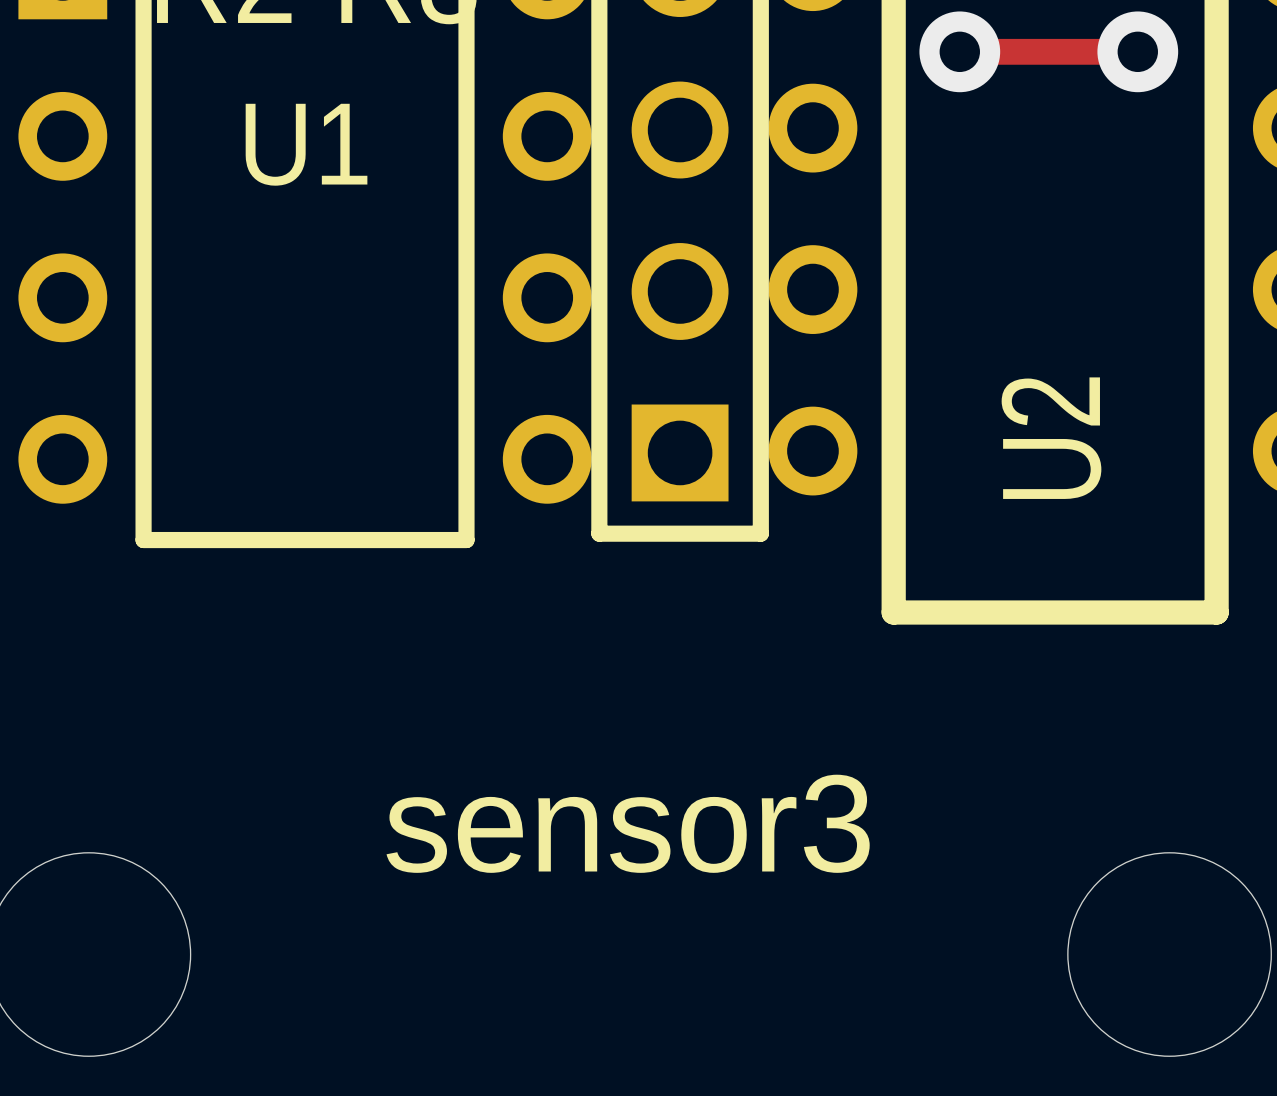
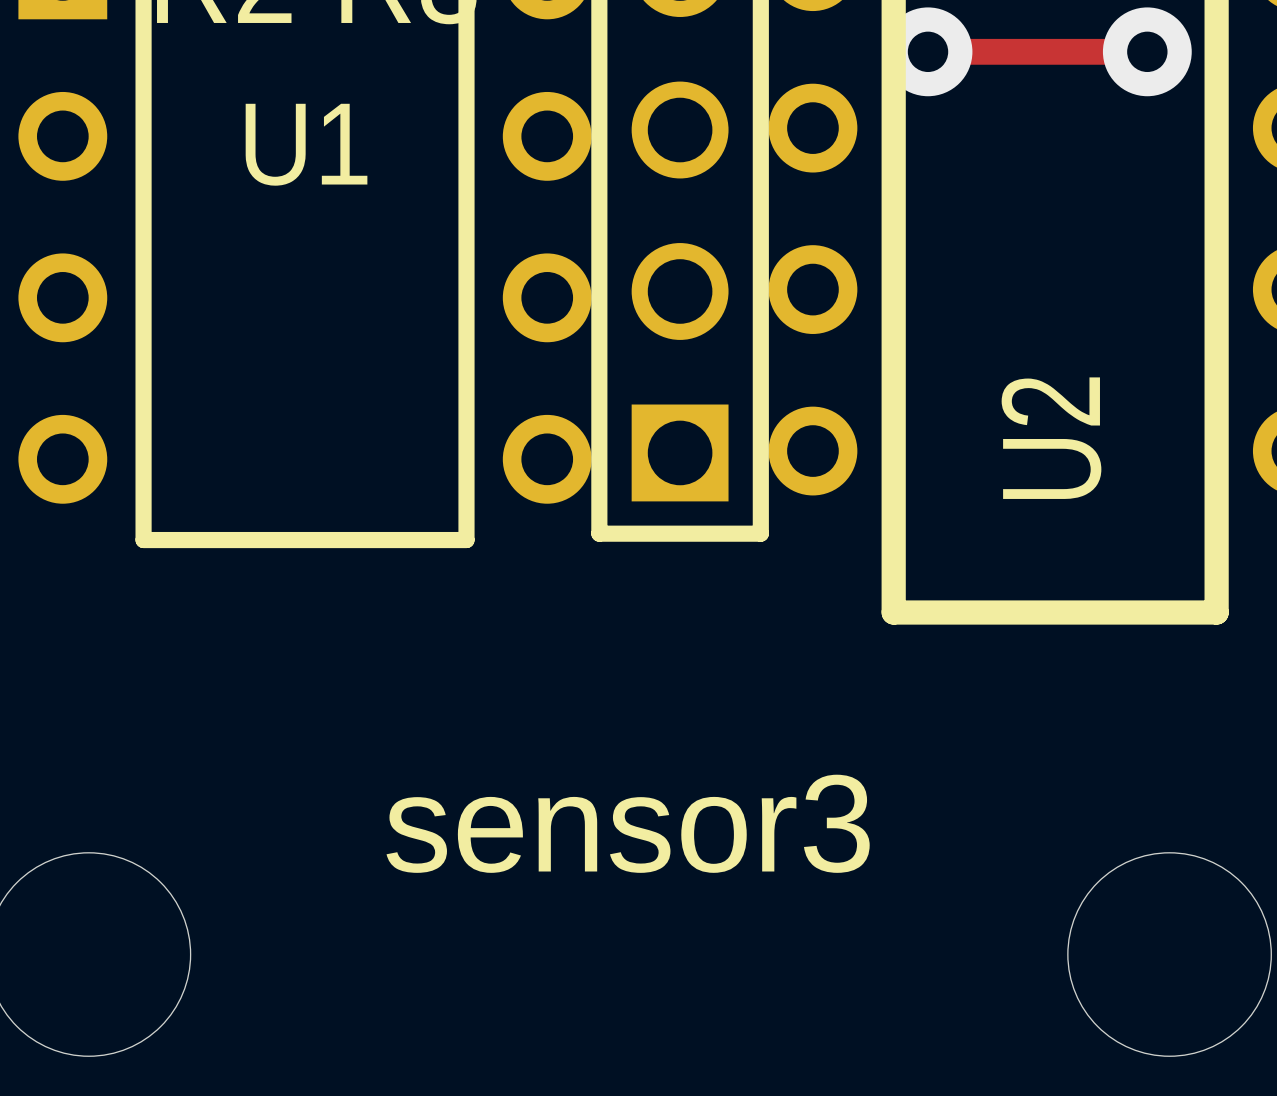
via size: [1097, 11, 1179, 93] -> [1102, 7, 1192, 97]
via position: (959, 51) -> (928, 51)

